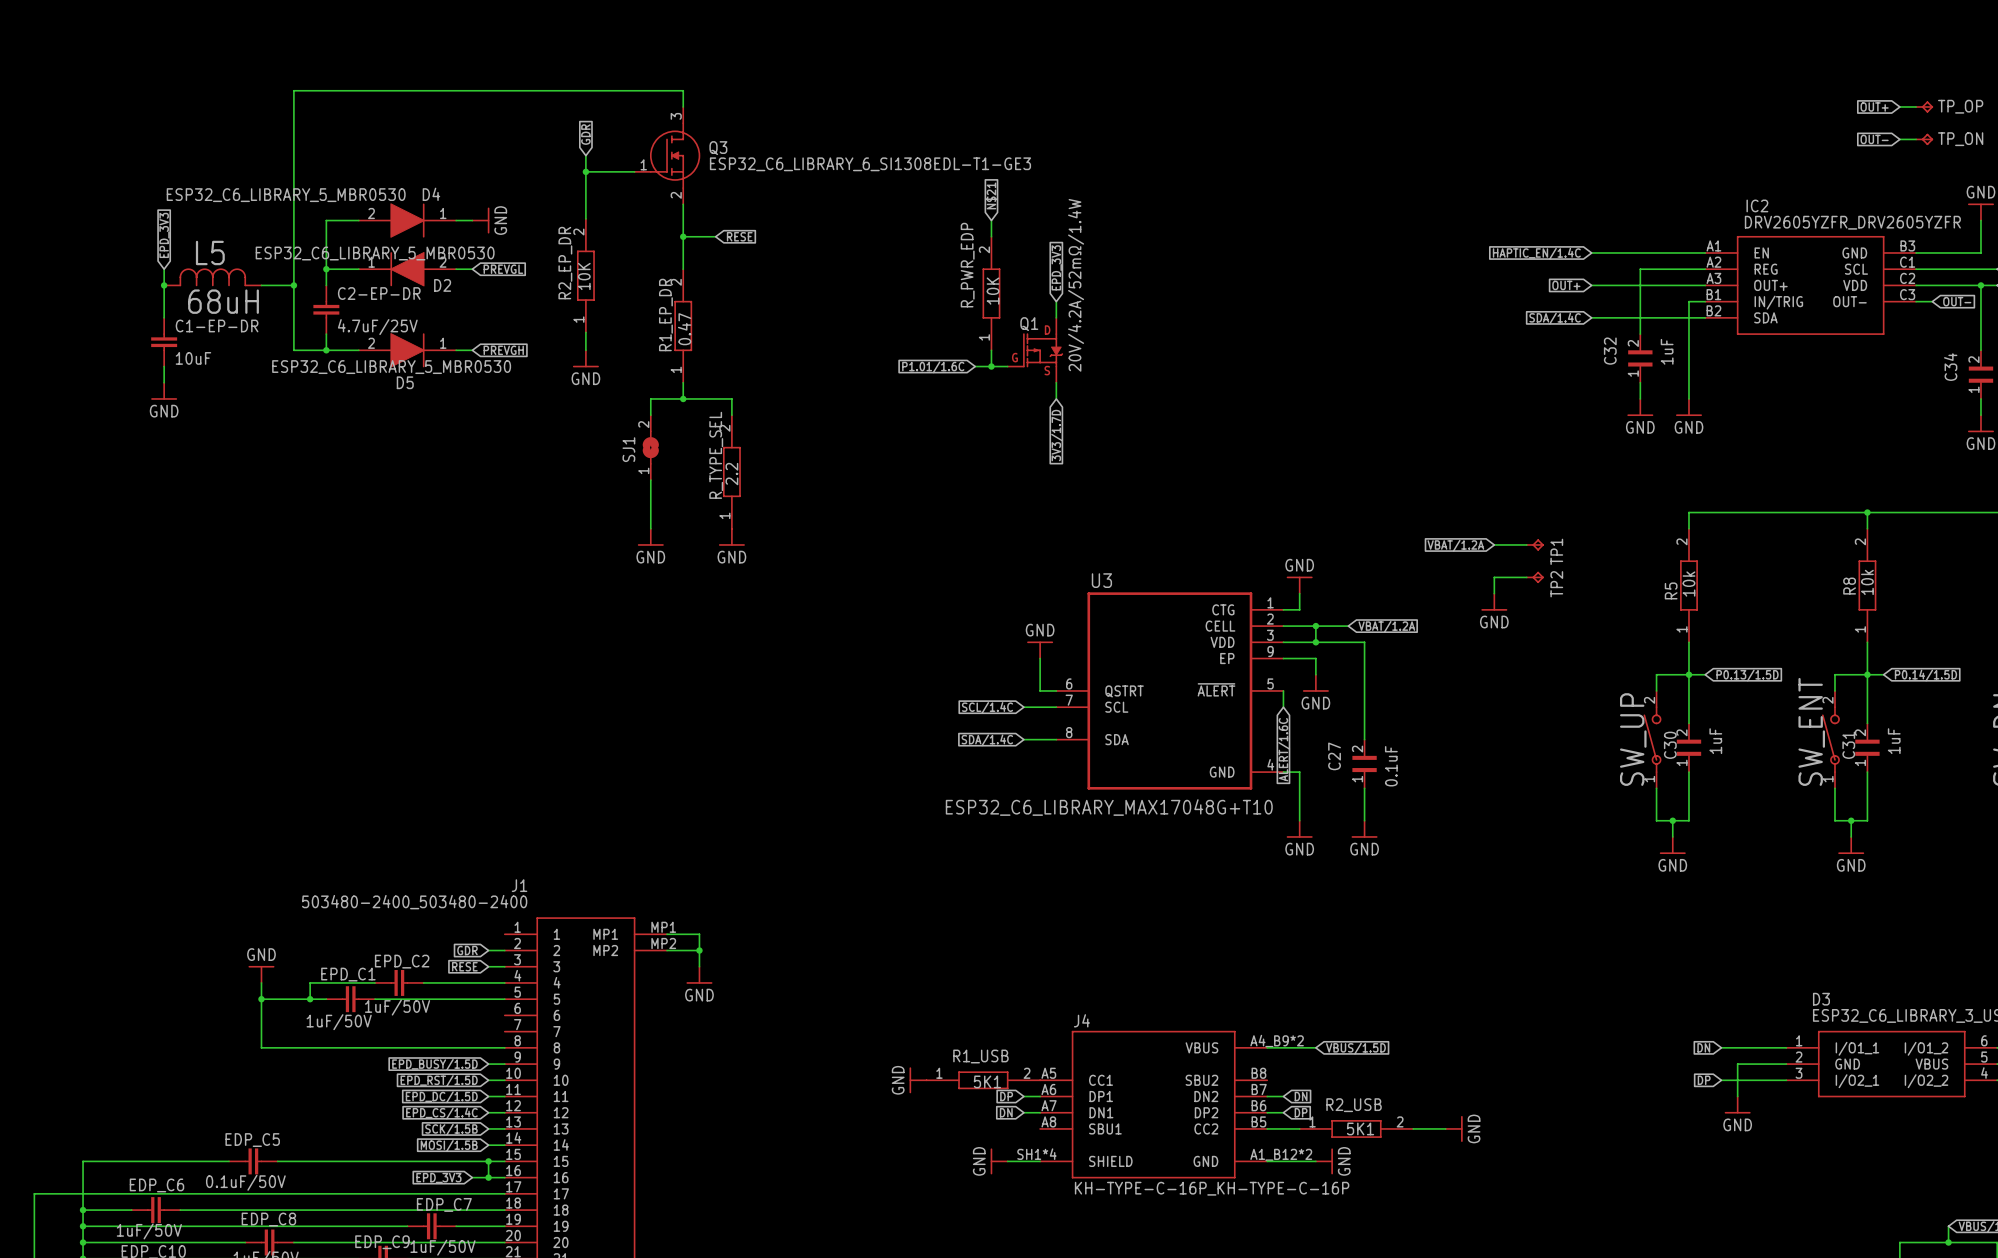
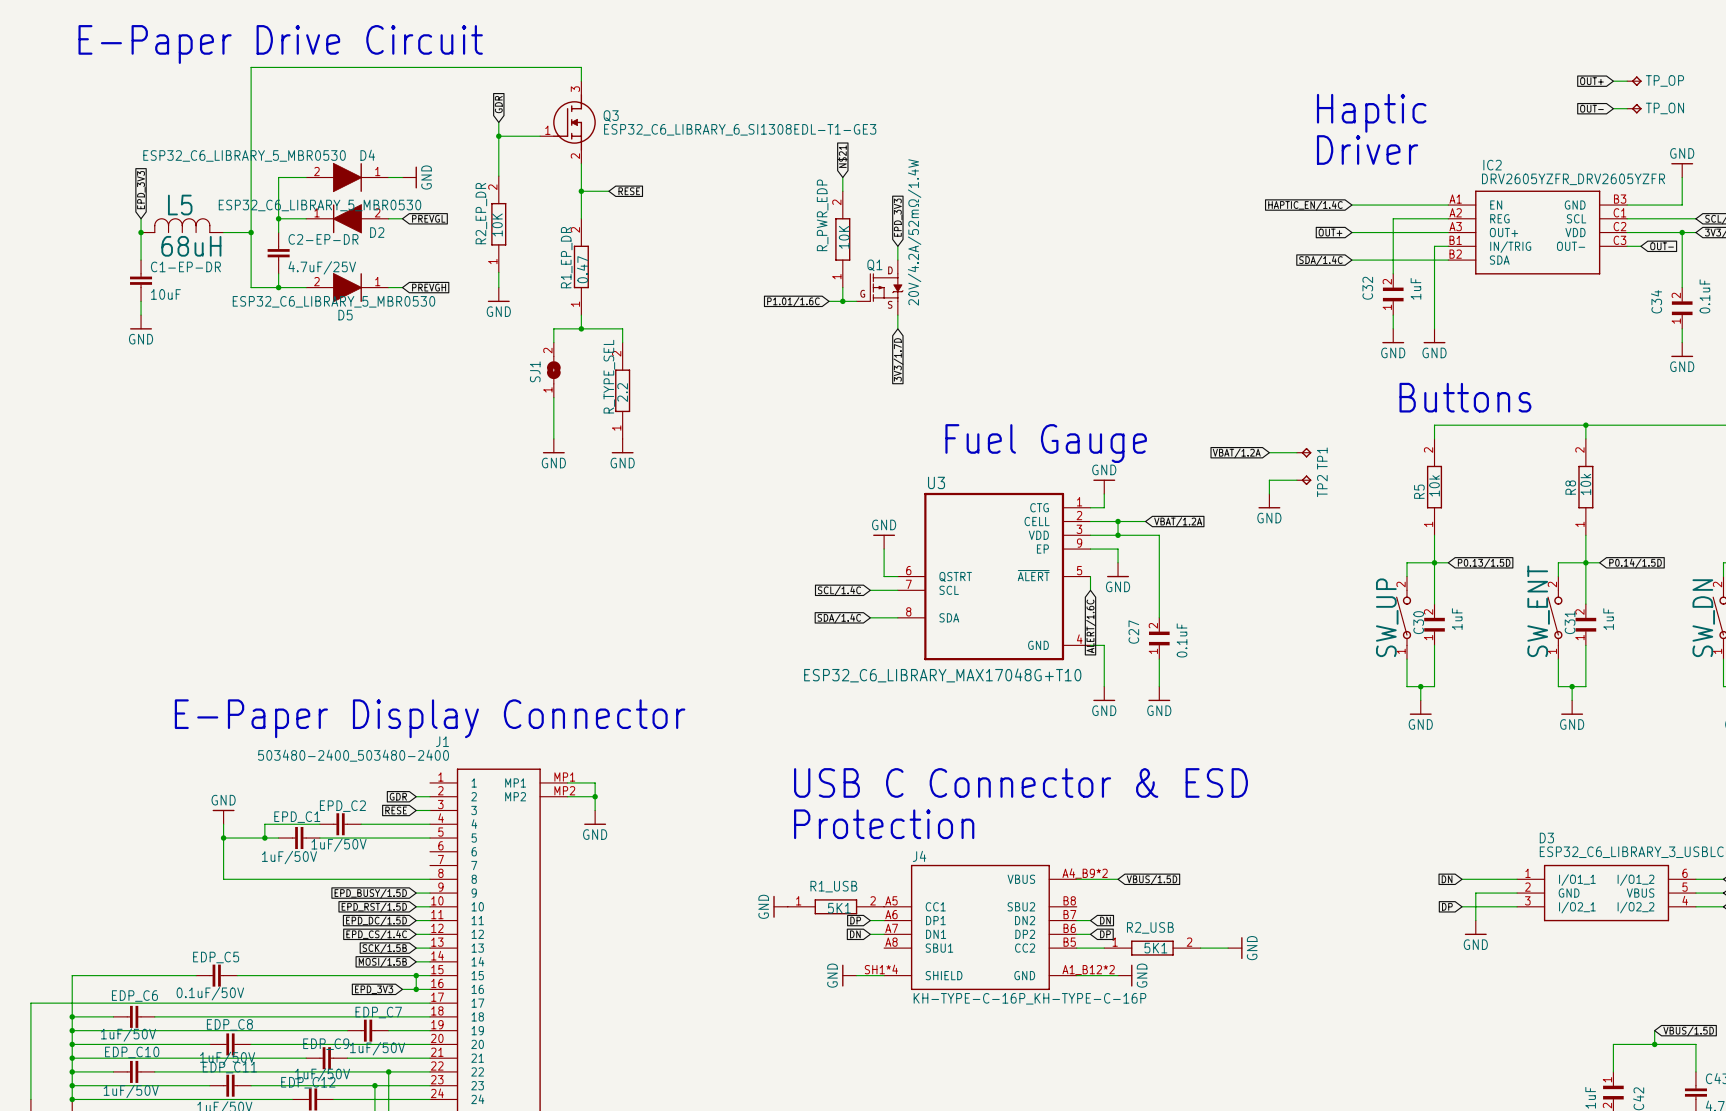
text: none -> E-Paper Drive Circuit (280, 44)
text: none -> Haptic (1371, 113)
text: none -> Driver (1367, 149)
text: none -> Buttons (1465, 397)
text: none -> Fuel Gauge (1046, 443)
text: none -> E-Paper Display Connector (430, 718)
text: none -> USB C Connector & ESD (1020, 782)
text: none -> Protection (884, 824)

